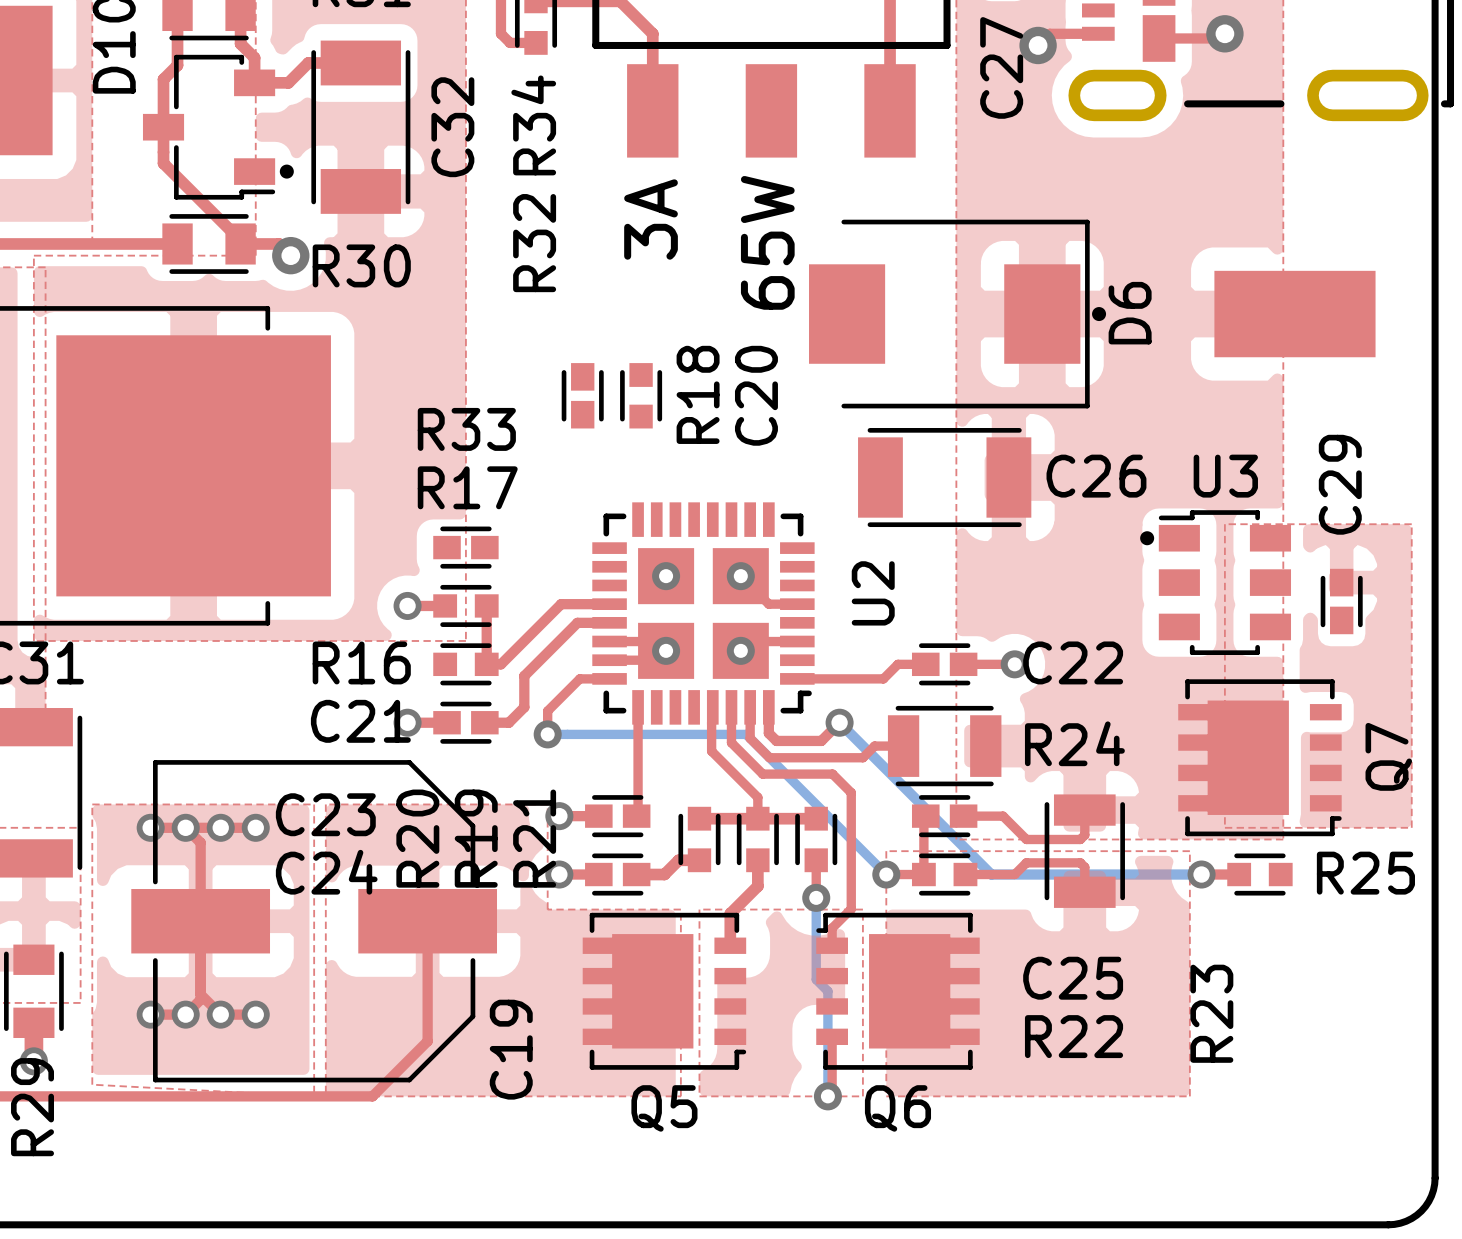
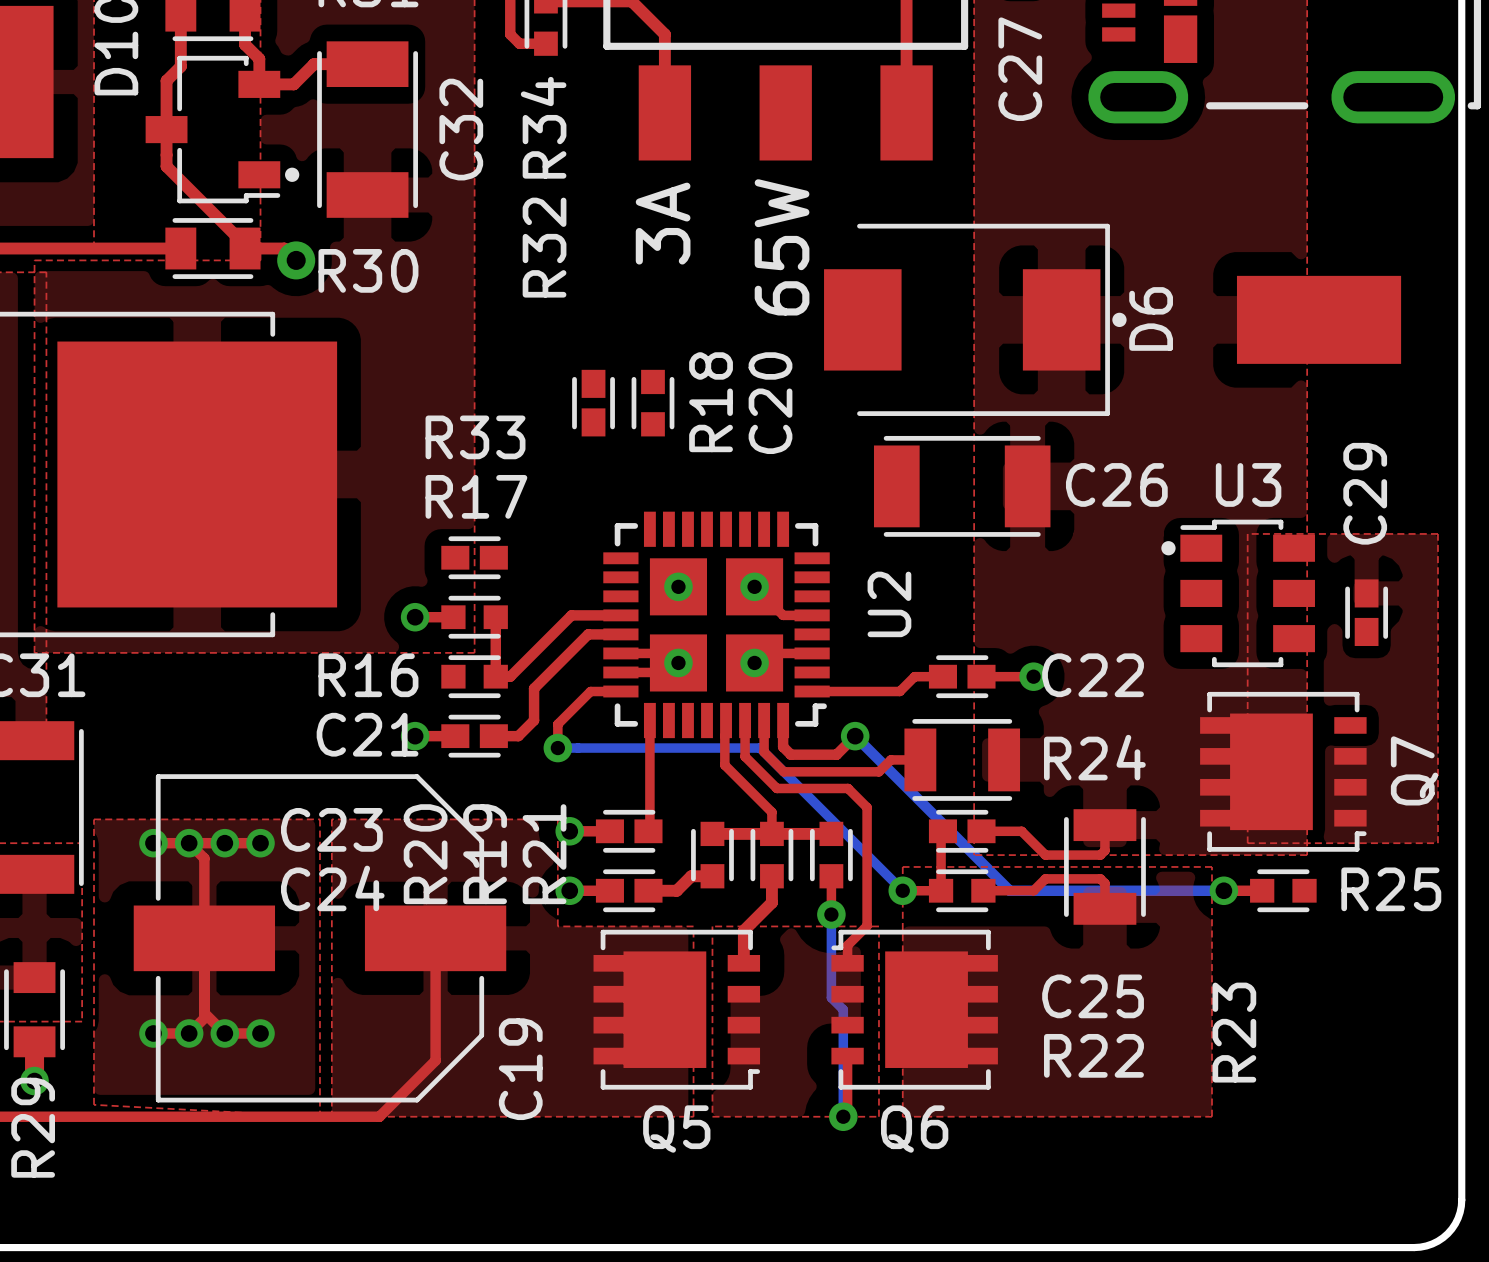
top track: (1098, 33) (1049, 33) (1038, 45) -> none
top track: (1224, 33) (1220, 38) (1159, 38) -> none
via: (1224, 33) -> none
via: (1038, 45) -> none

